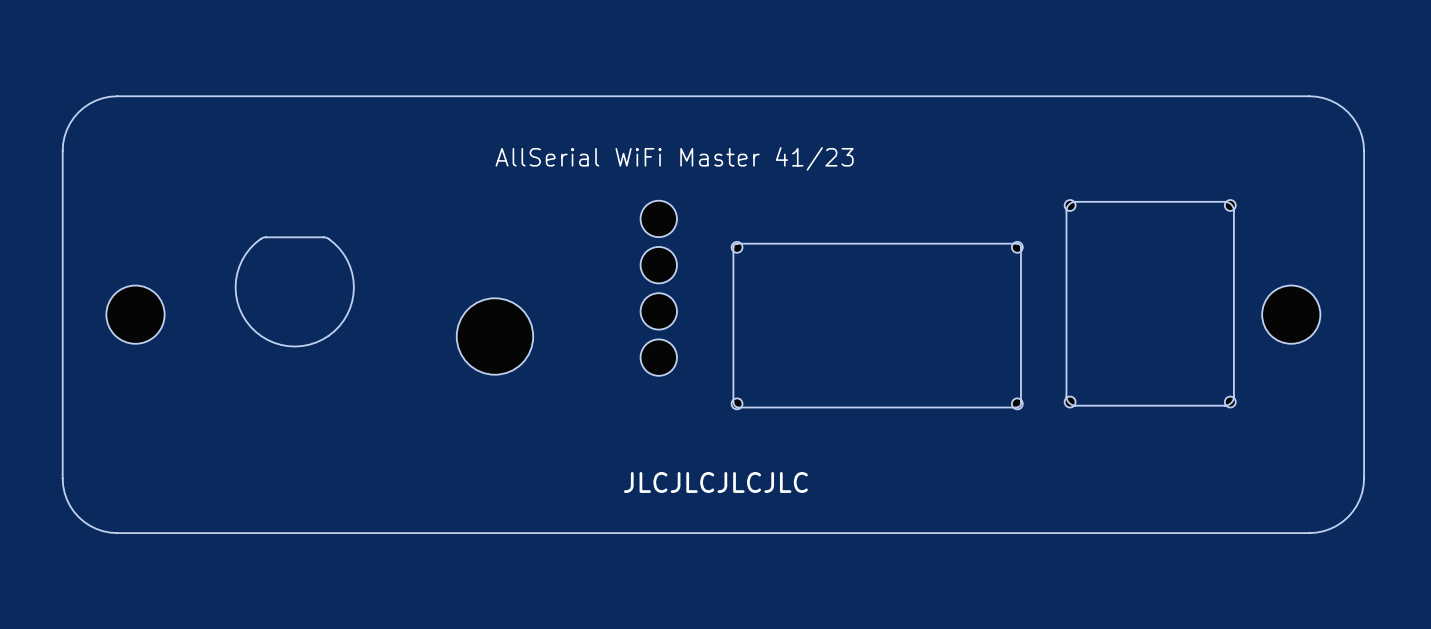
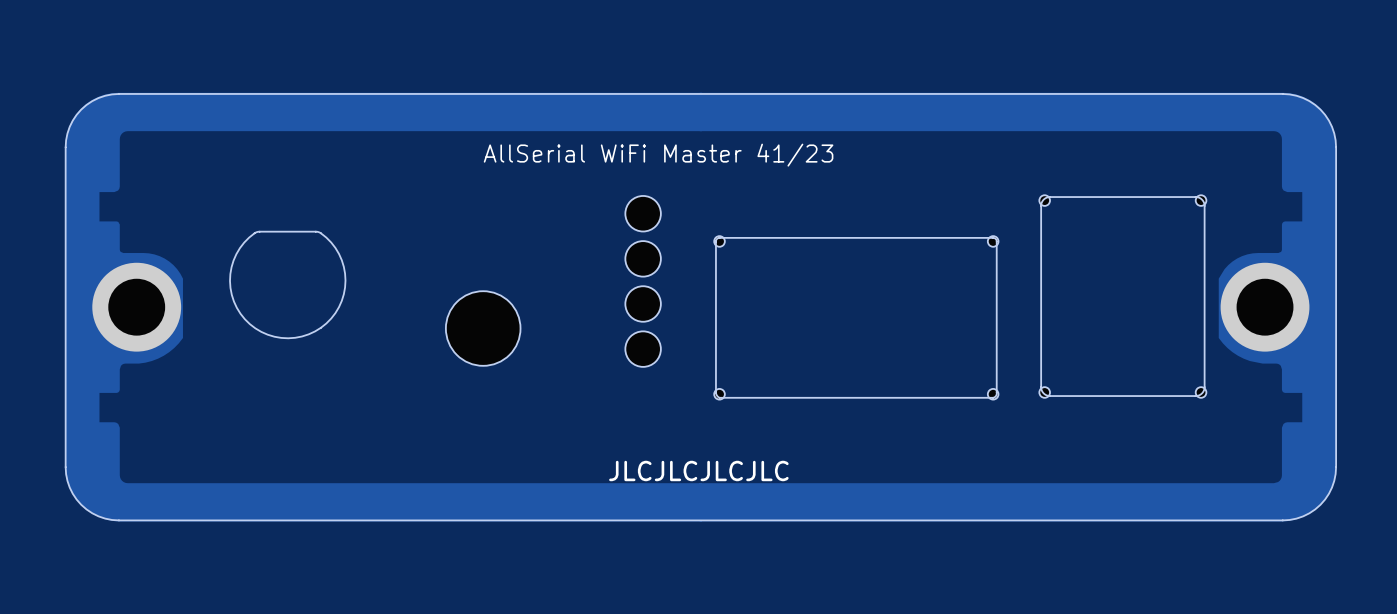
part footprint: [62, 95, 1365, 534] -> [65, 92, 1337, 522]

